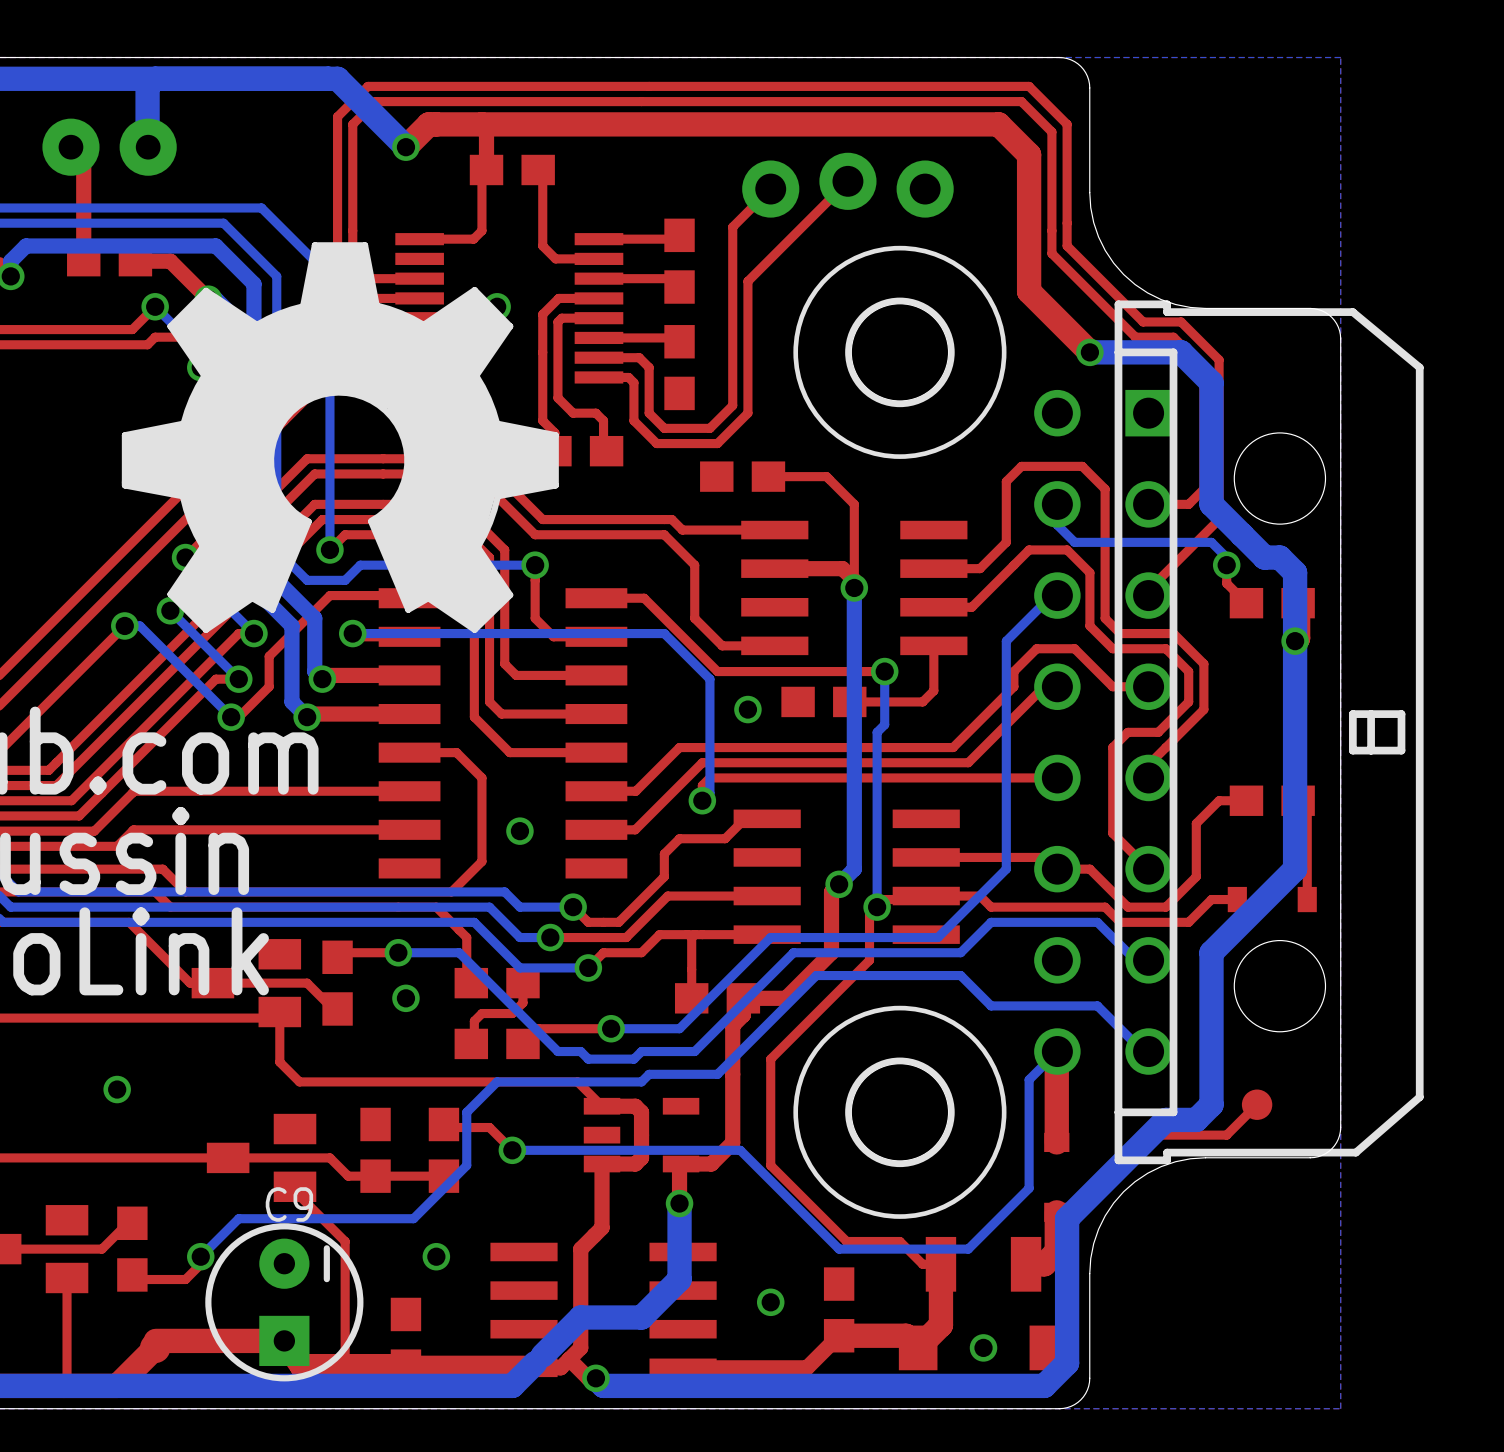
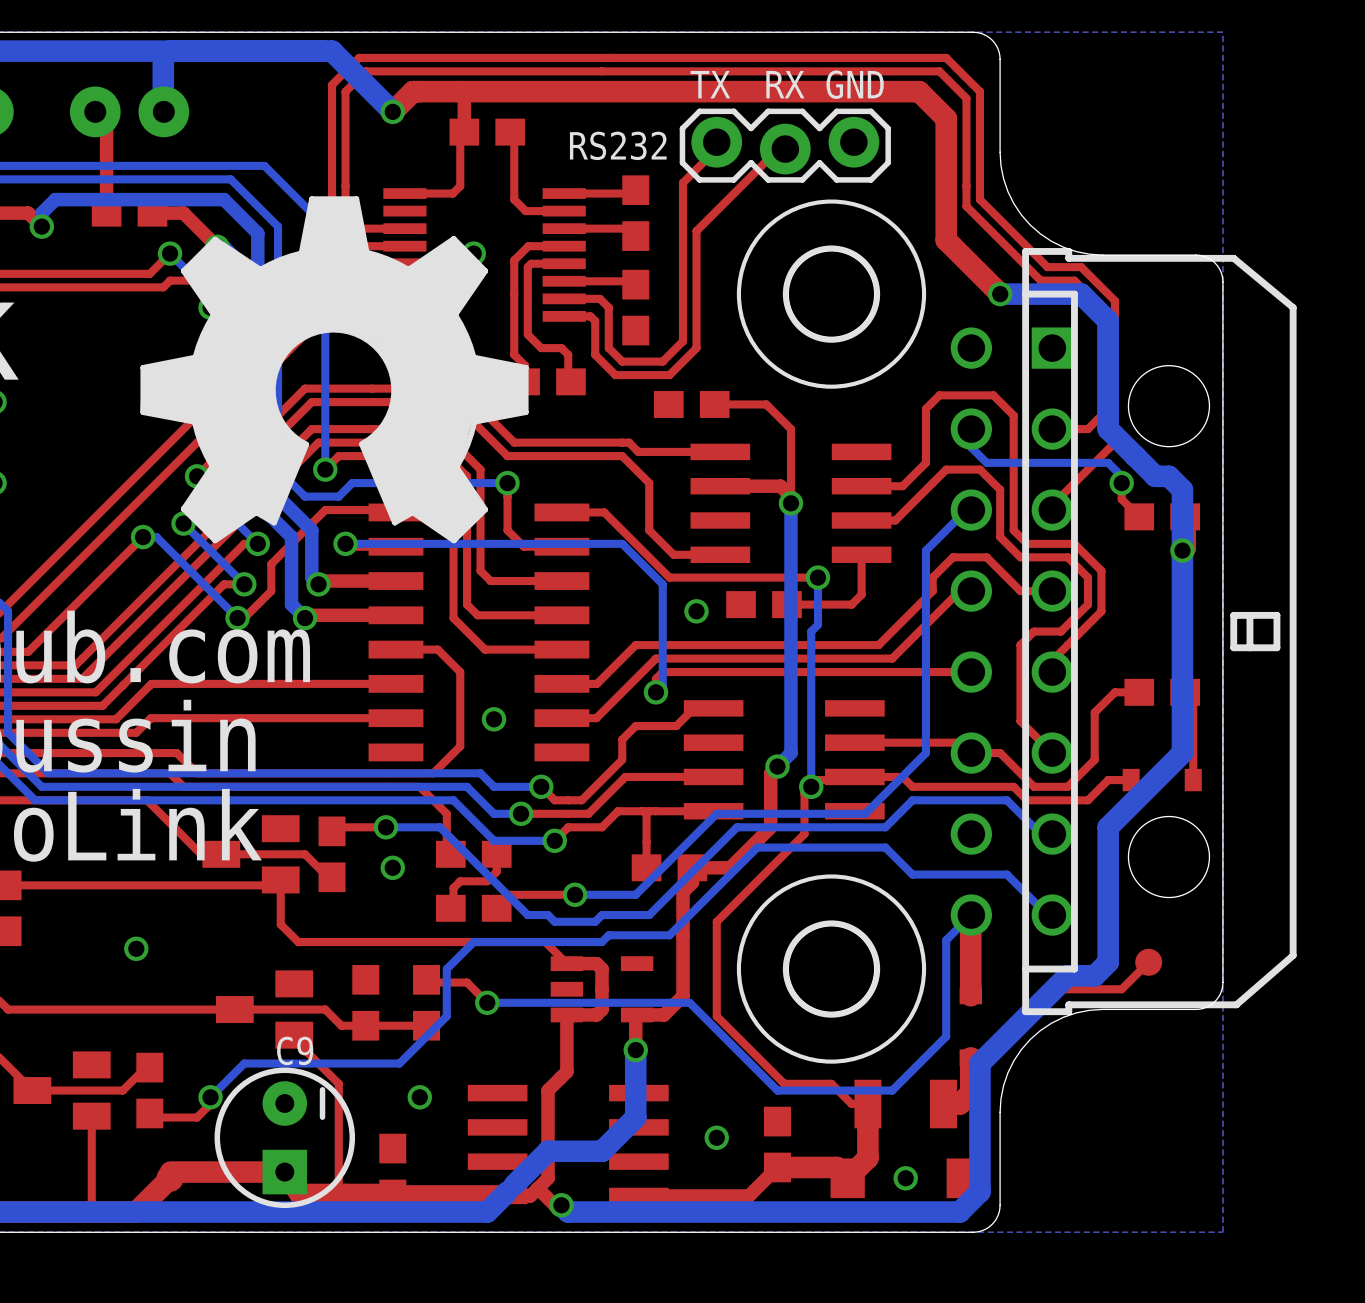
text: none -> TX (710, 84)
text: none -> RX (785, 84)
text: none -> GND (855, 84)
text: none -> RS232 (618, 145)
part side: top (847, 185) -> bottom (785, 145)

